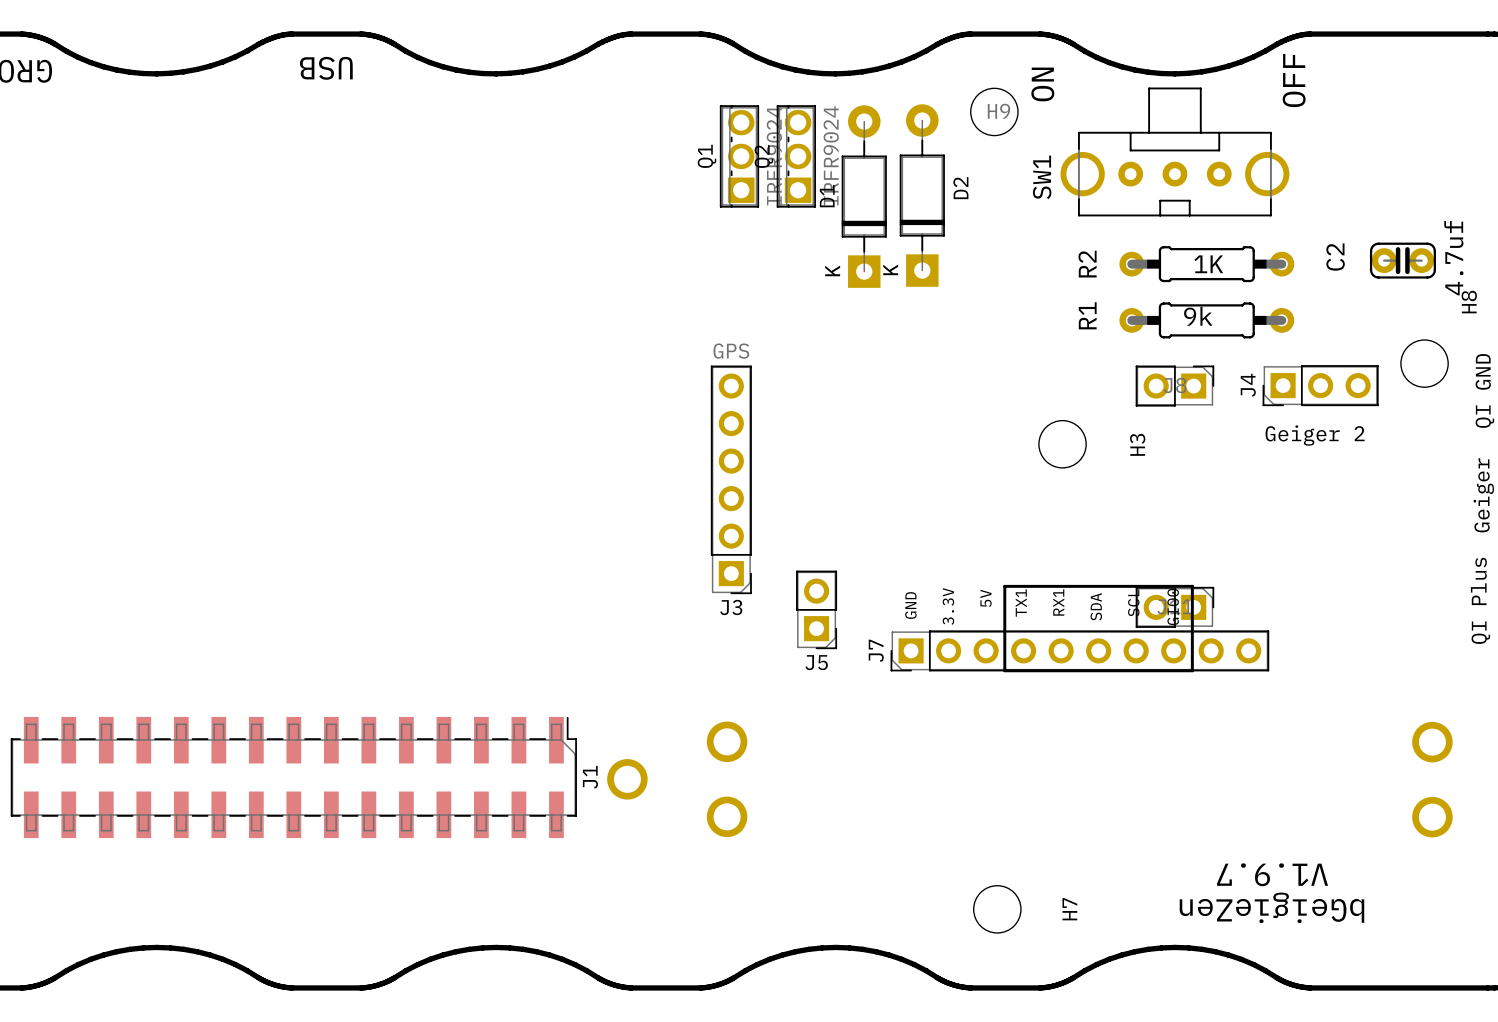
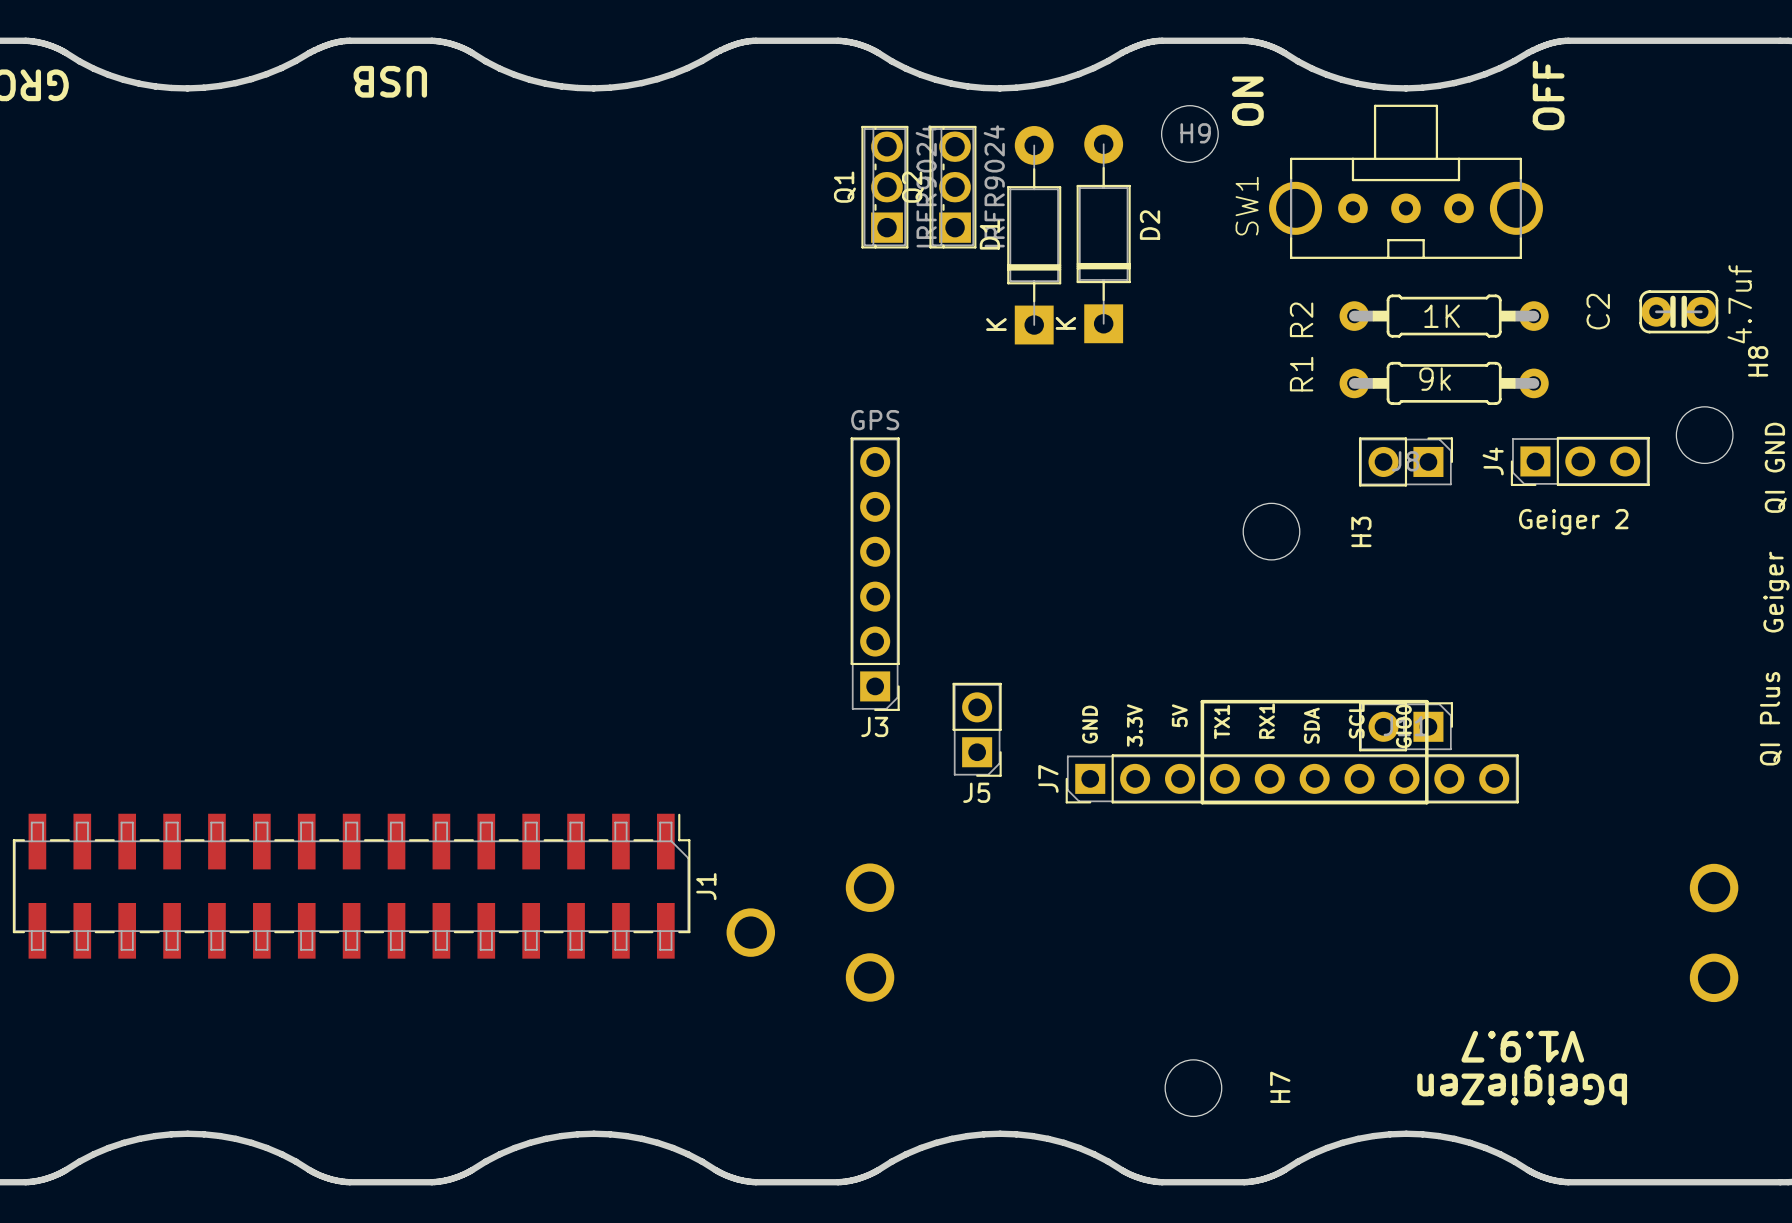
J1 position: (293, 777) -> (351, 886)

